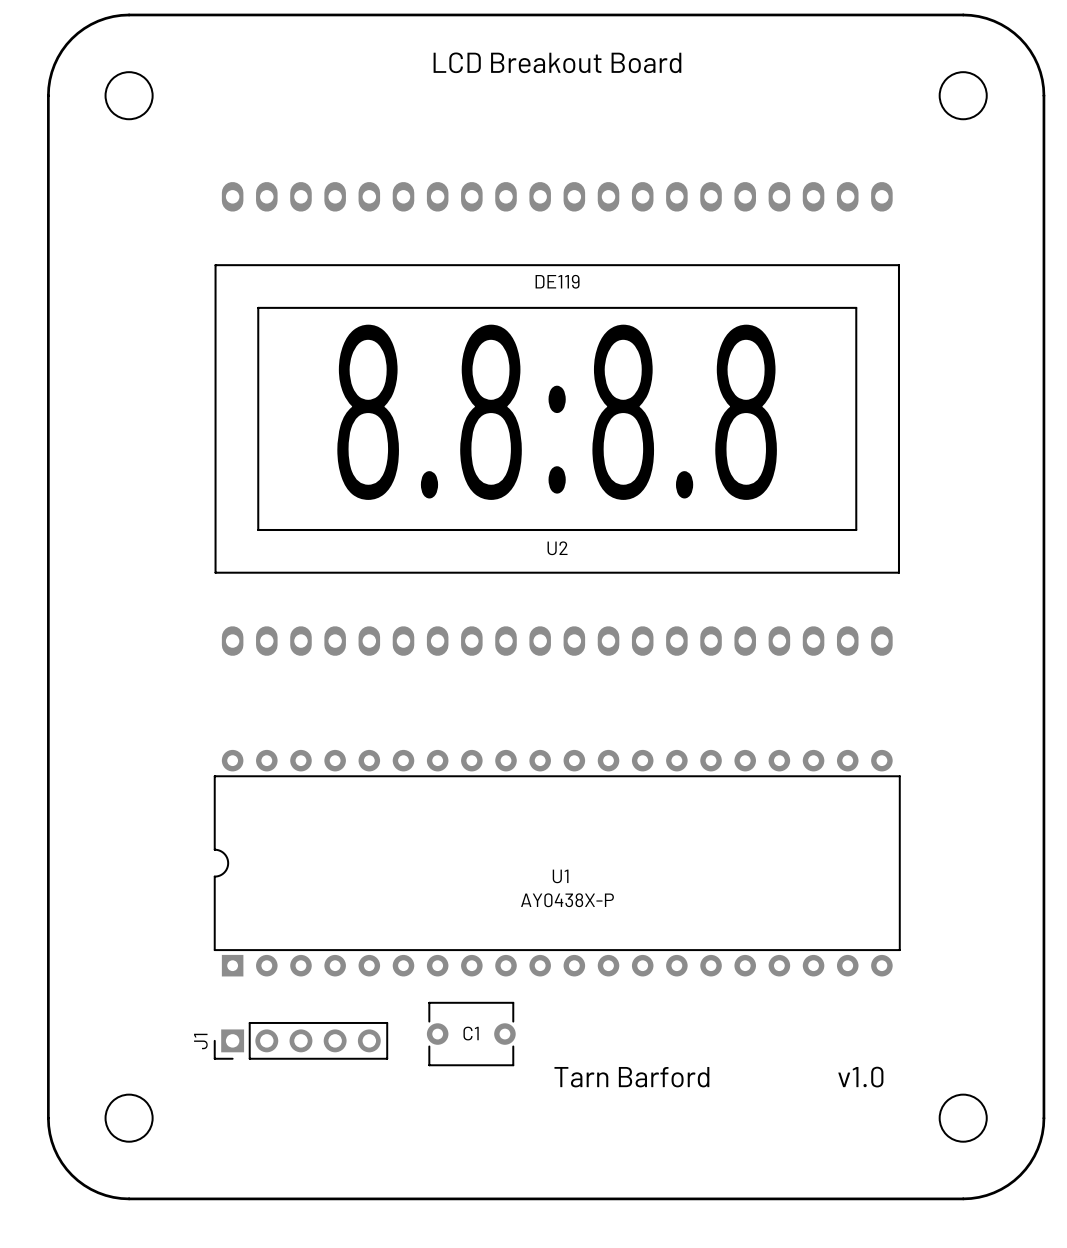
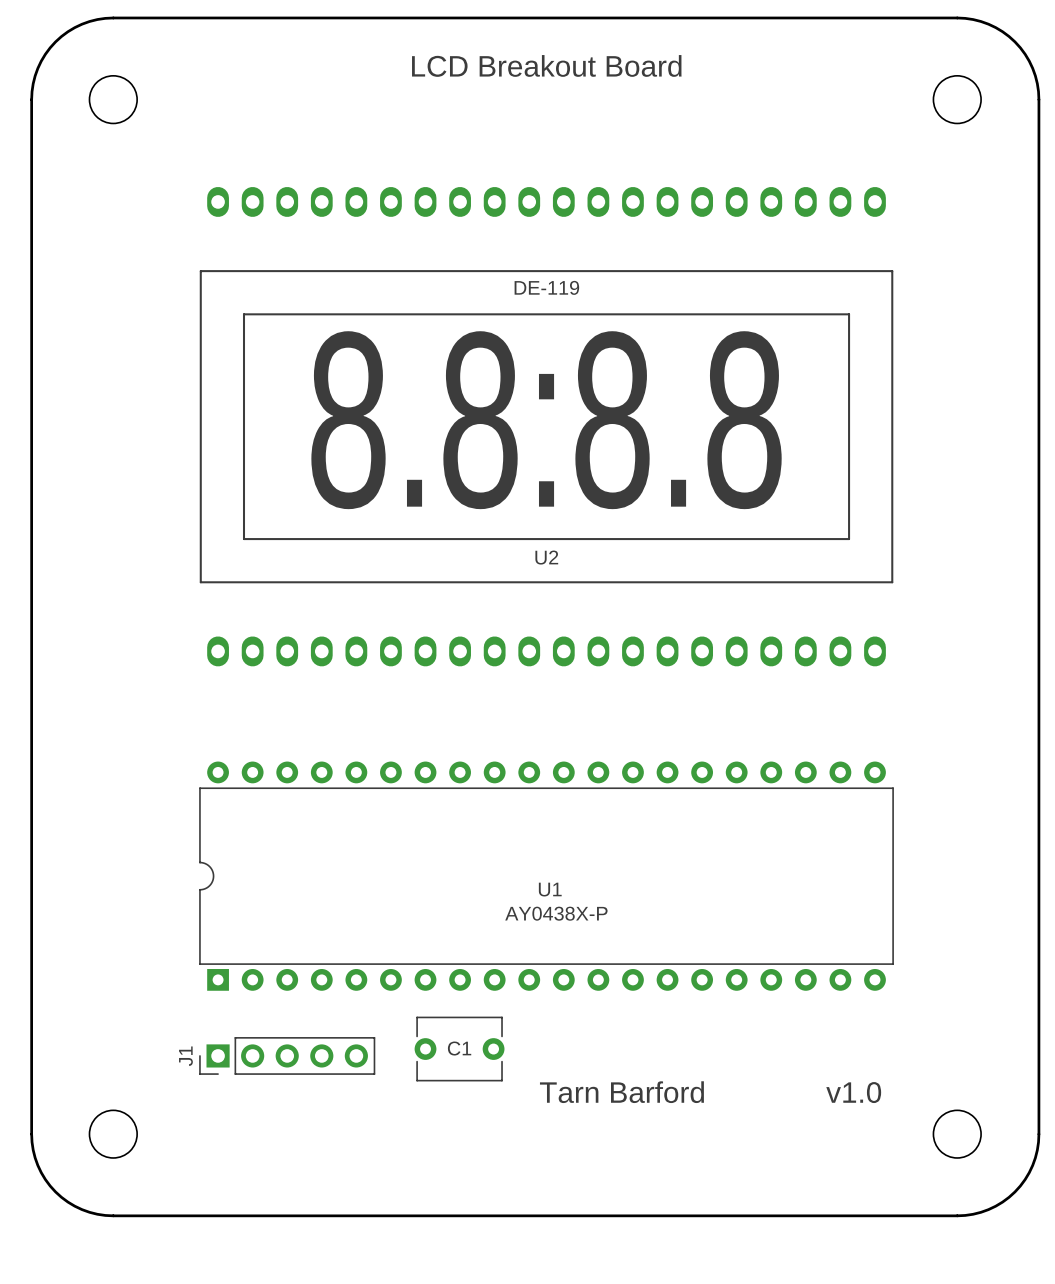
U2 value: DE119 (557, 281) -> DE-119 (546, 287)

